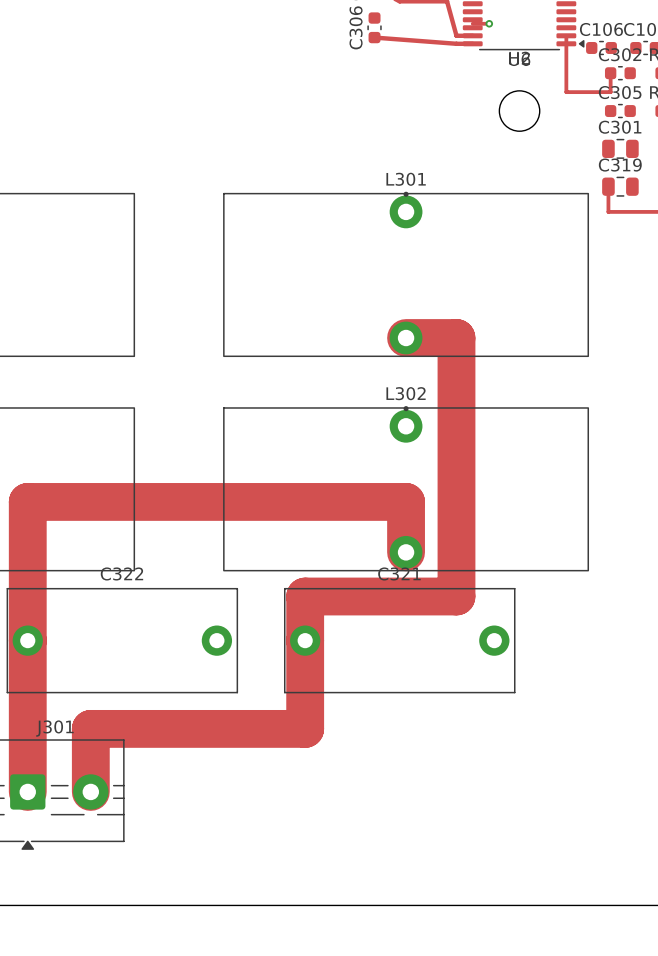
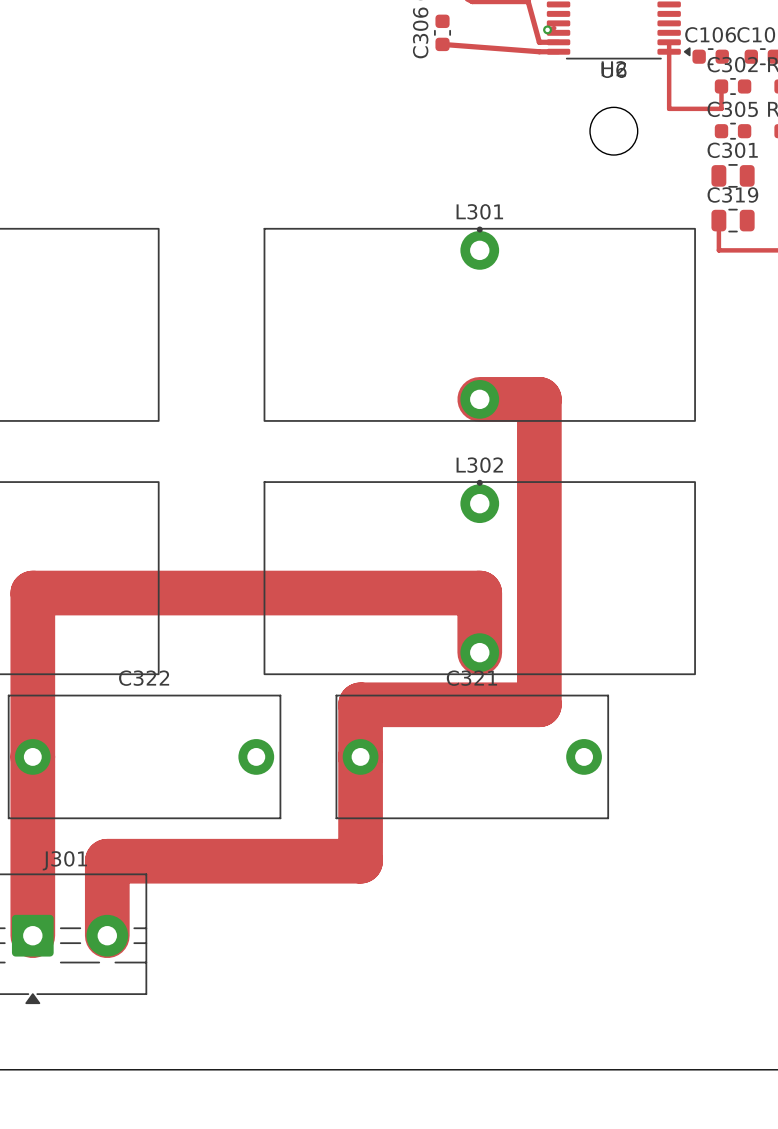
track: none -> (554, 28) (547, 29)
track: (472, 23) (489, 23) -> none
via: (489, 23) -> none
via: none -> (547, 29)

